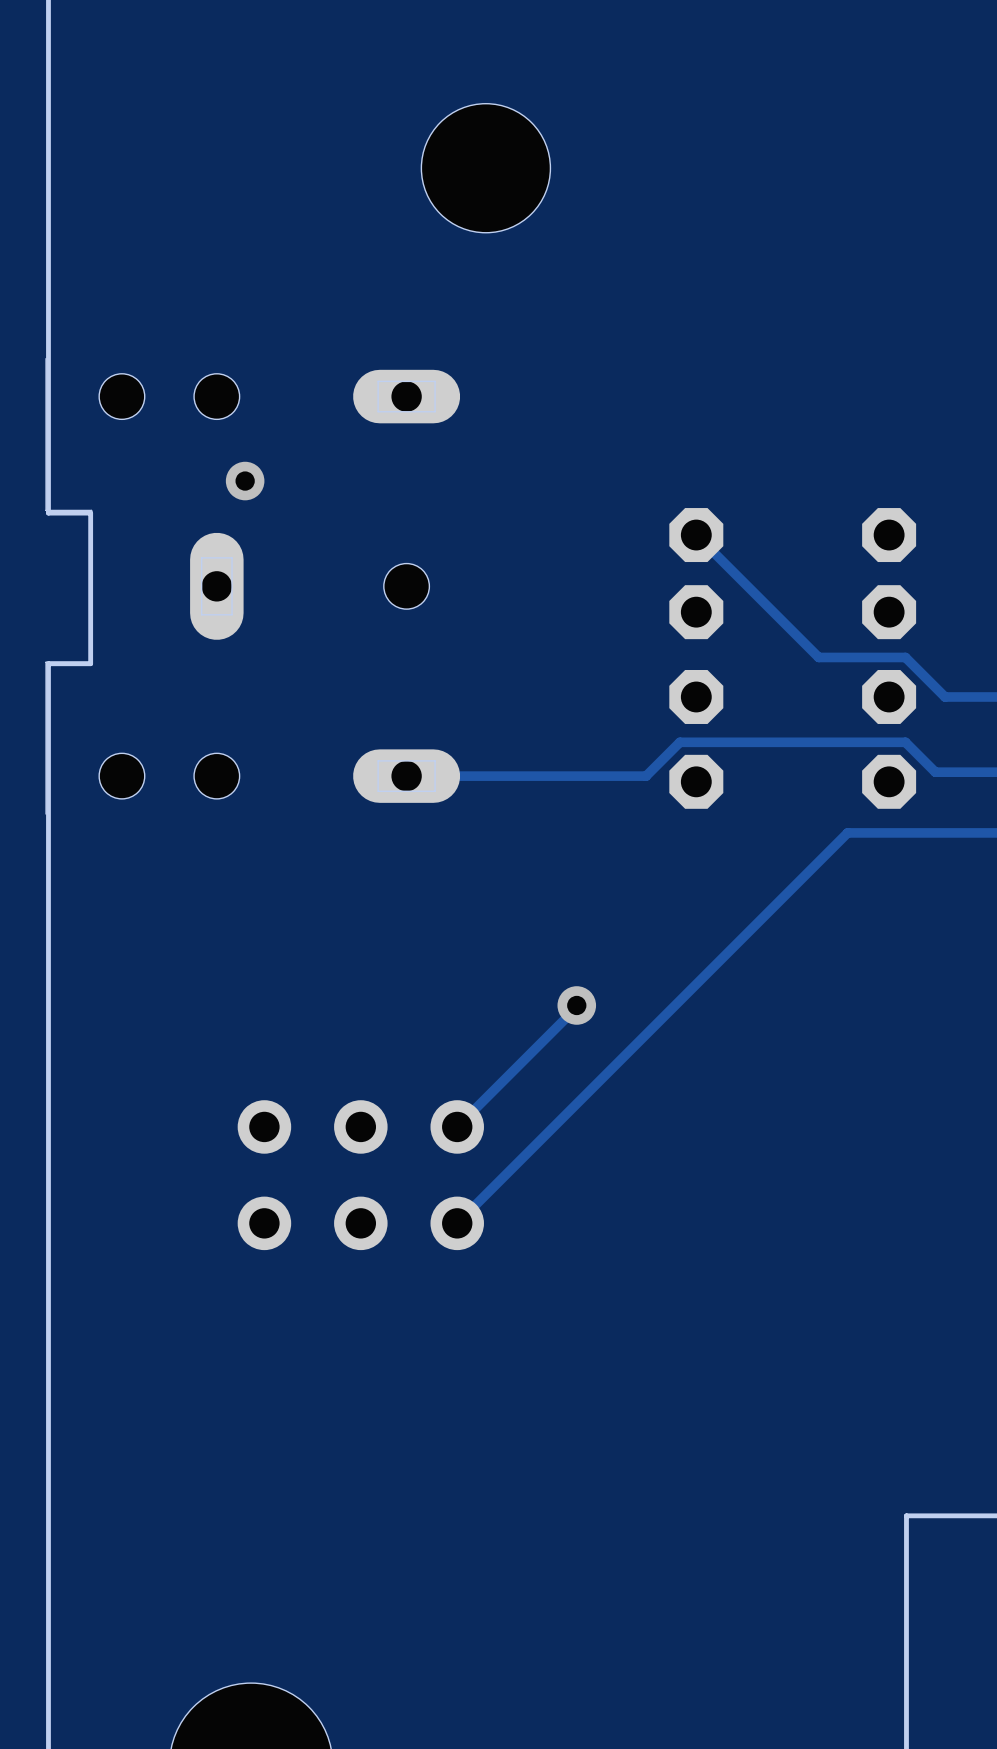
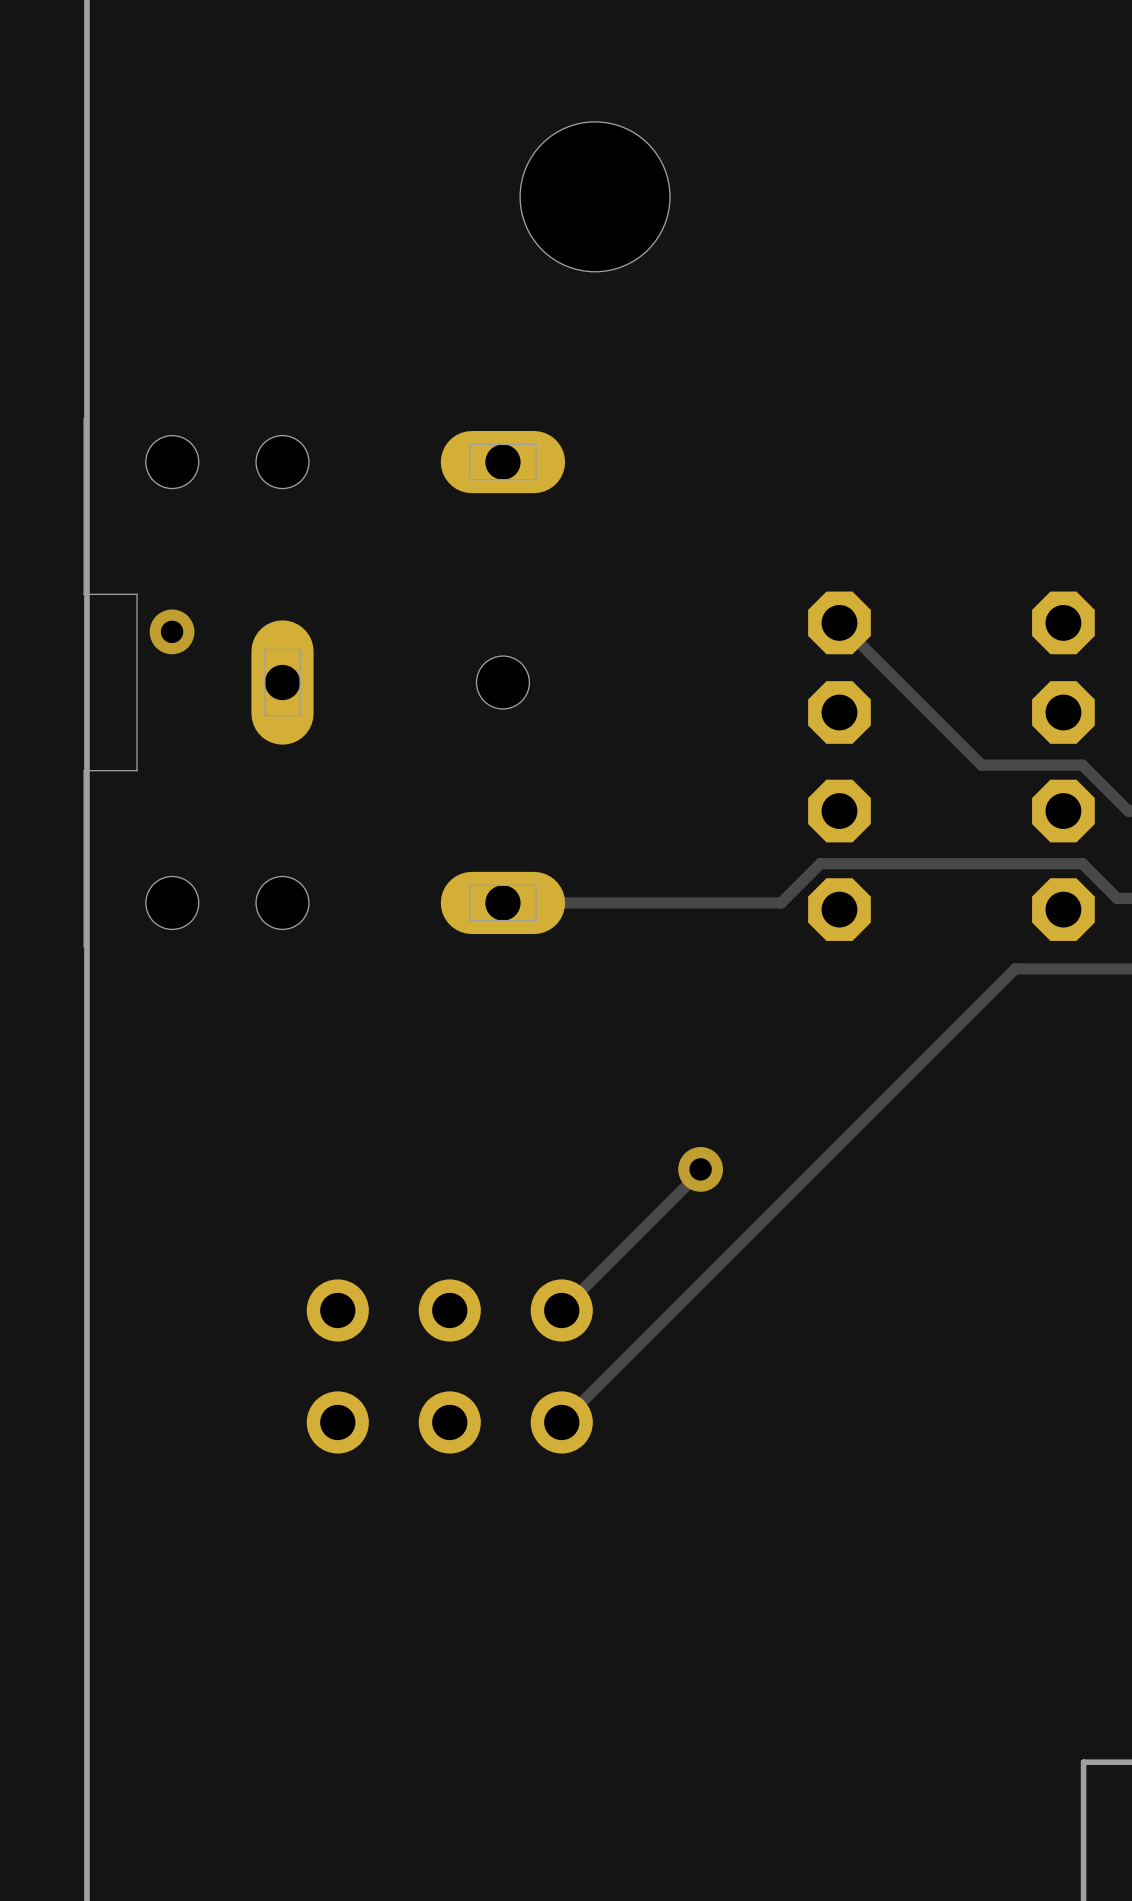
via position: (245, 481) -> (172, 631)
board edge: (48, 513) (90, 513) (90, 663) (48, 663) -> (86, 597) (86, 772)

